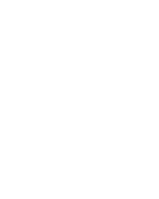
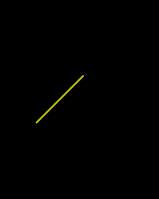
board edge: none -> (83, 75) (36, 122)

